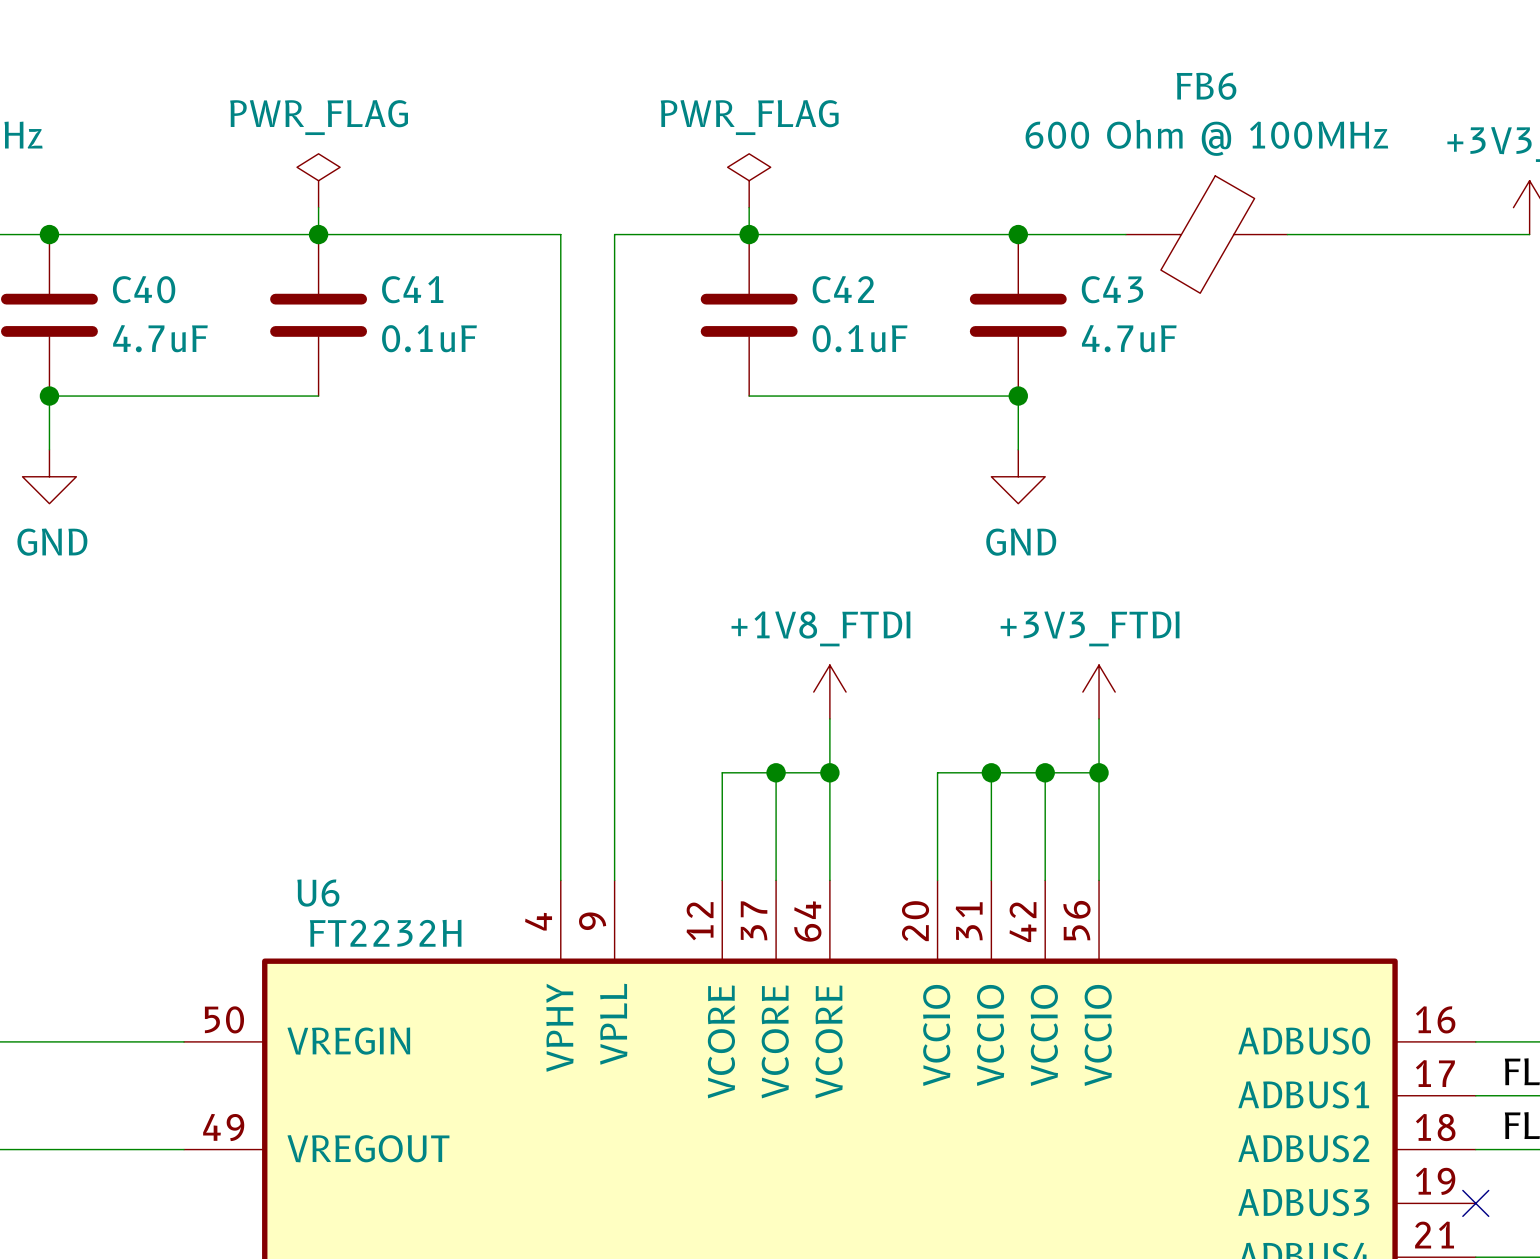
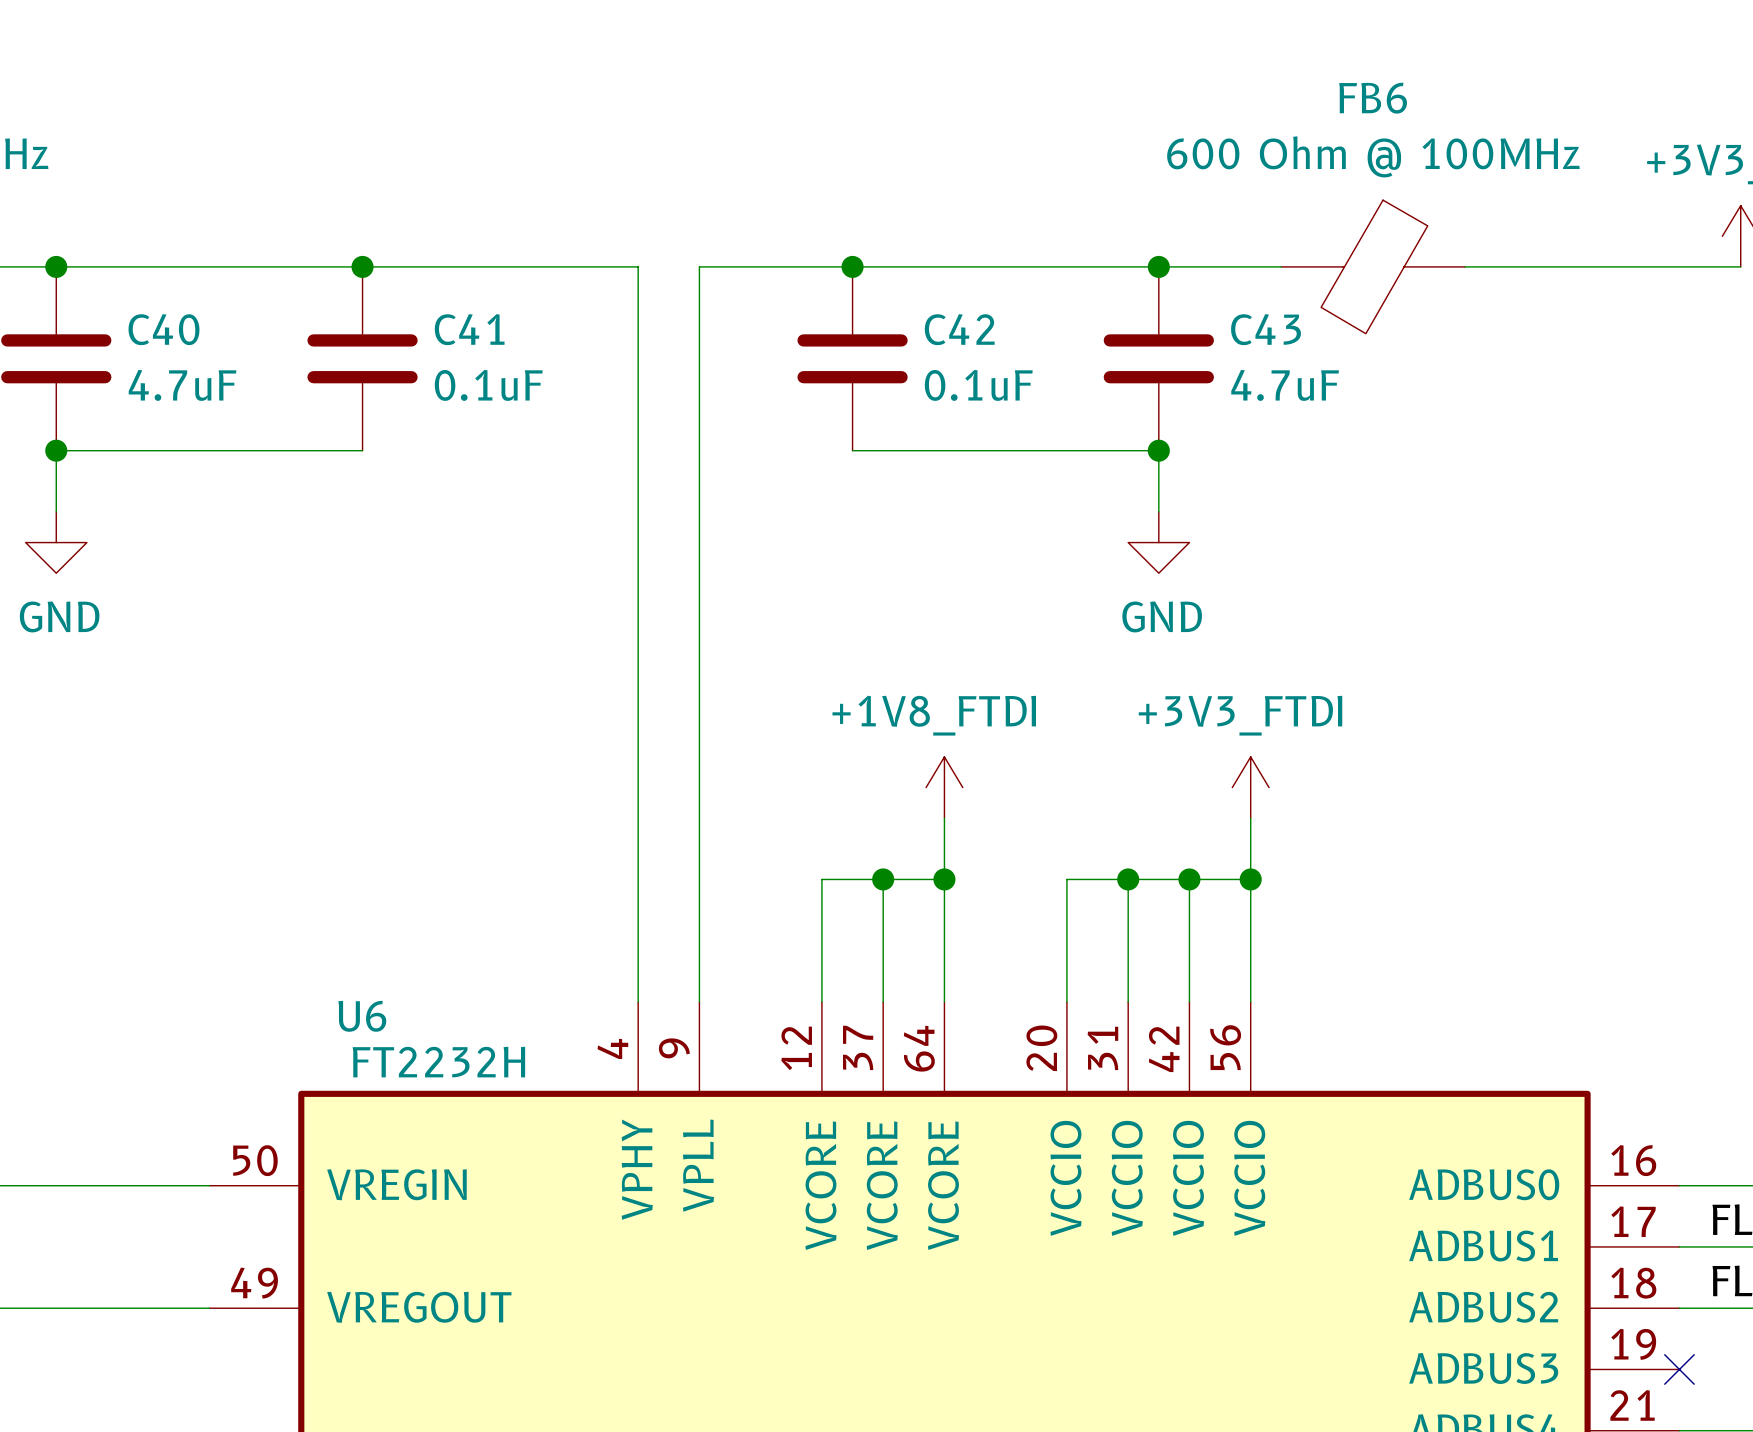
power symbol: PWR_FLAG (318, 180) -> none
power symbol: PWR_FLAG (749, 180) -> none
wire: (318, 207) (318, 234) -> none
wire: (749, 207) (749, 234) -> none

